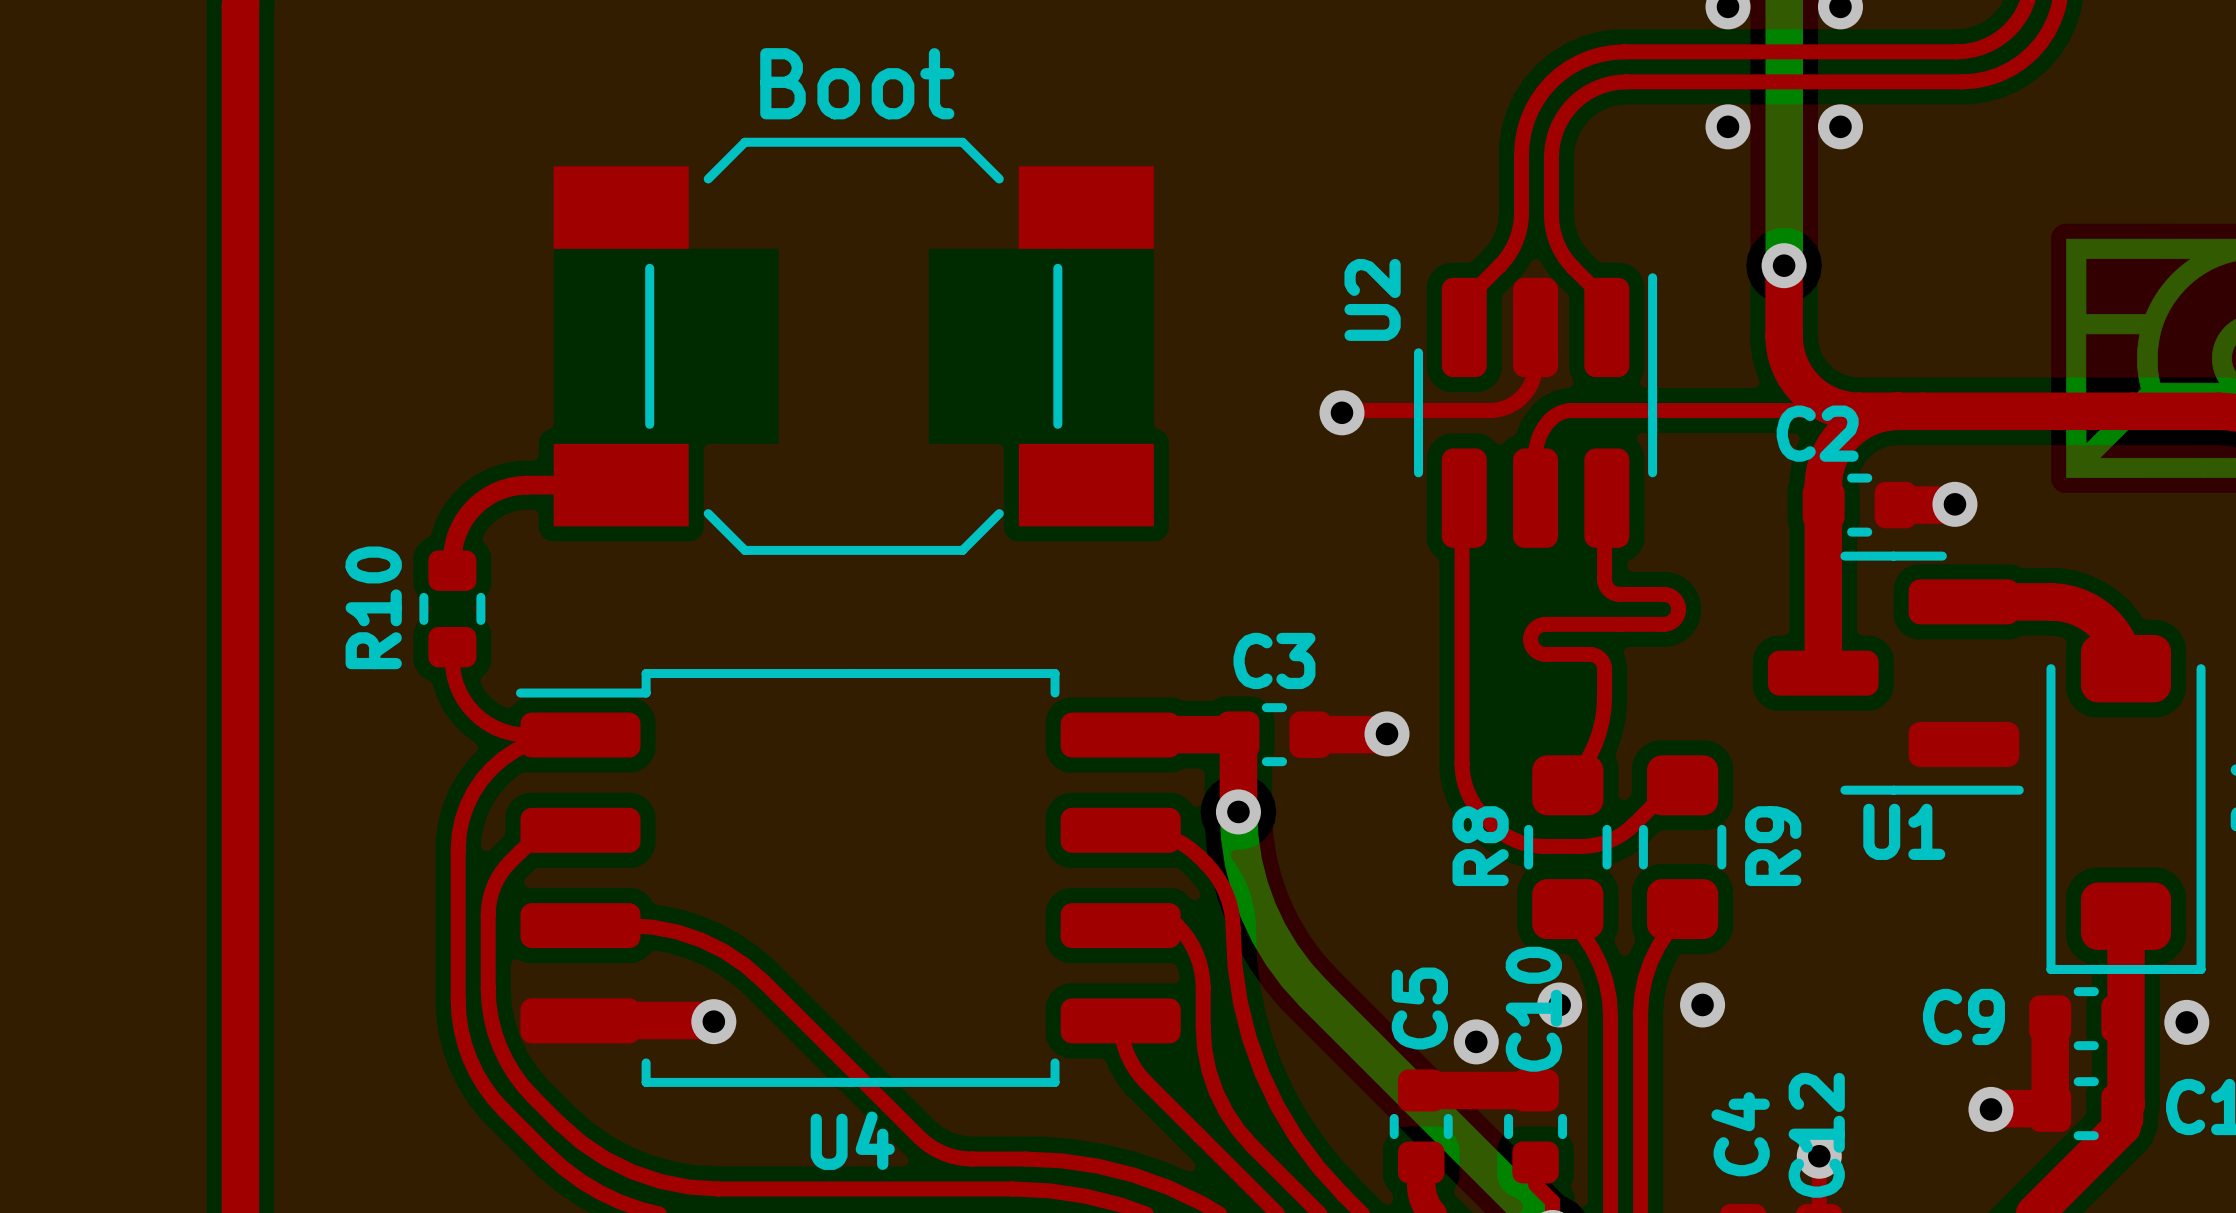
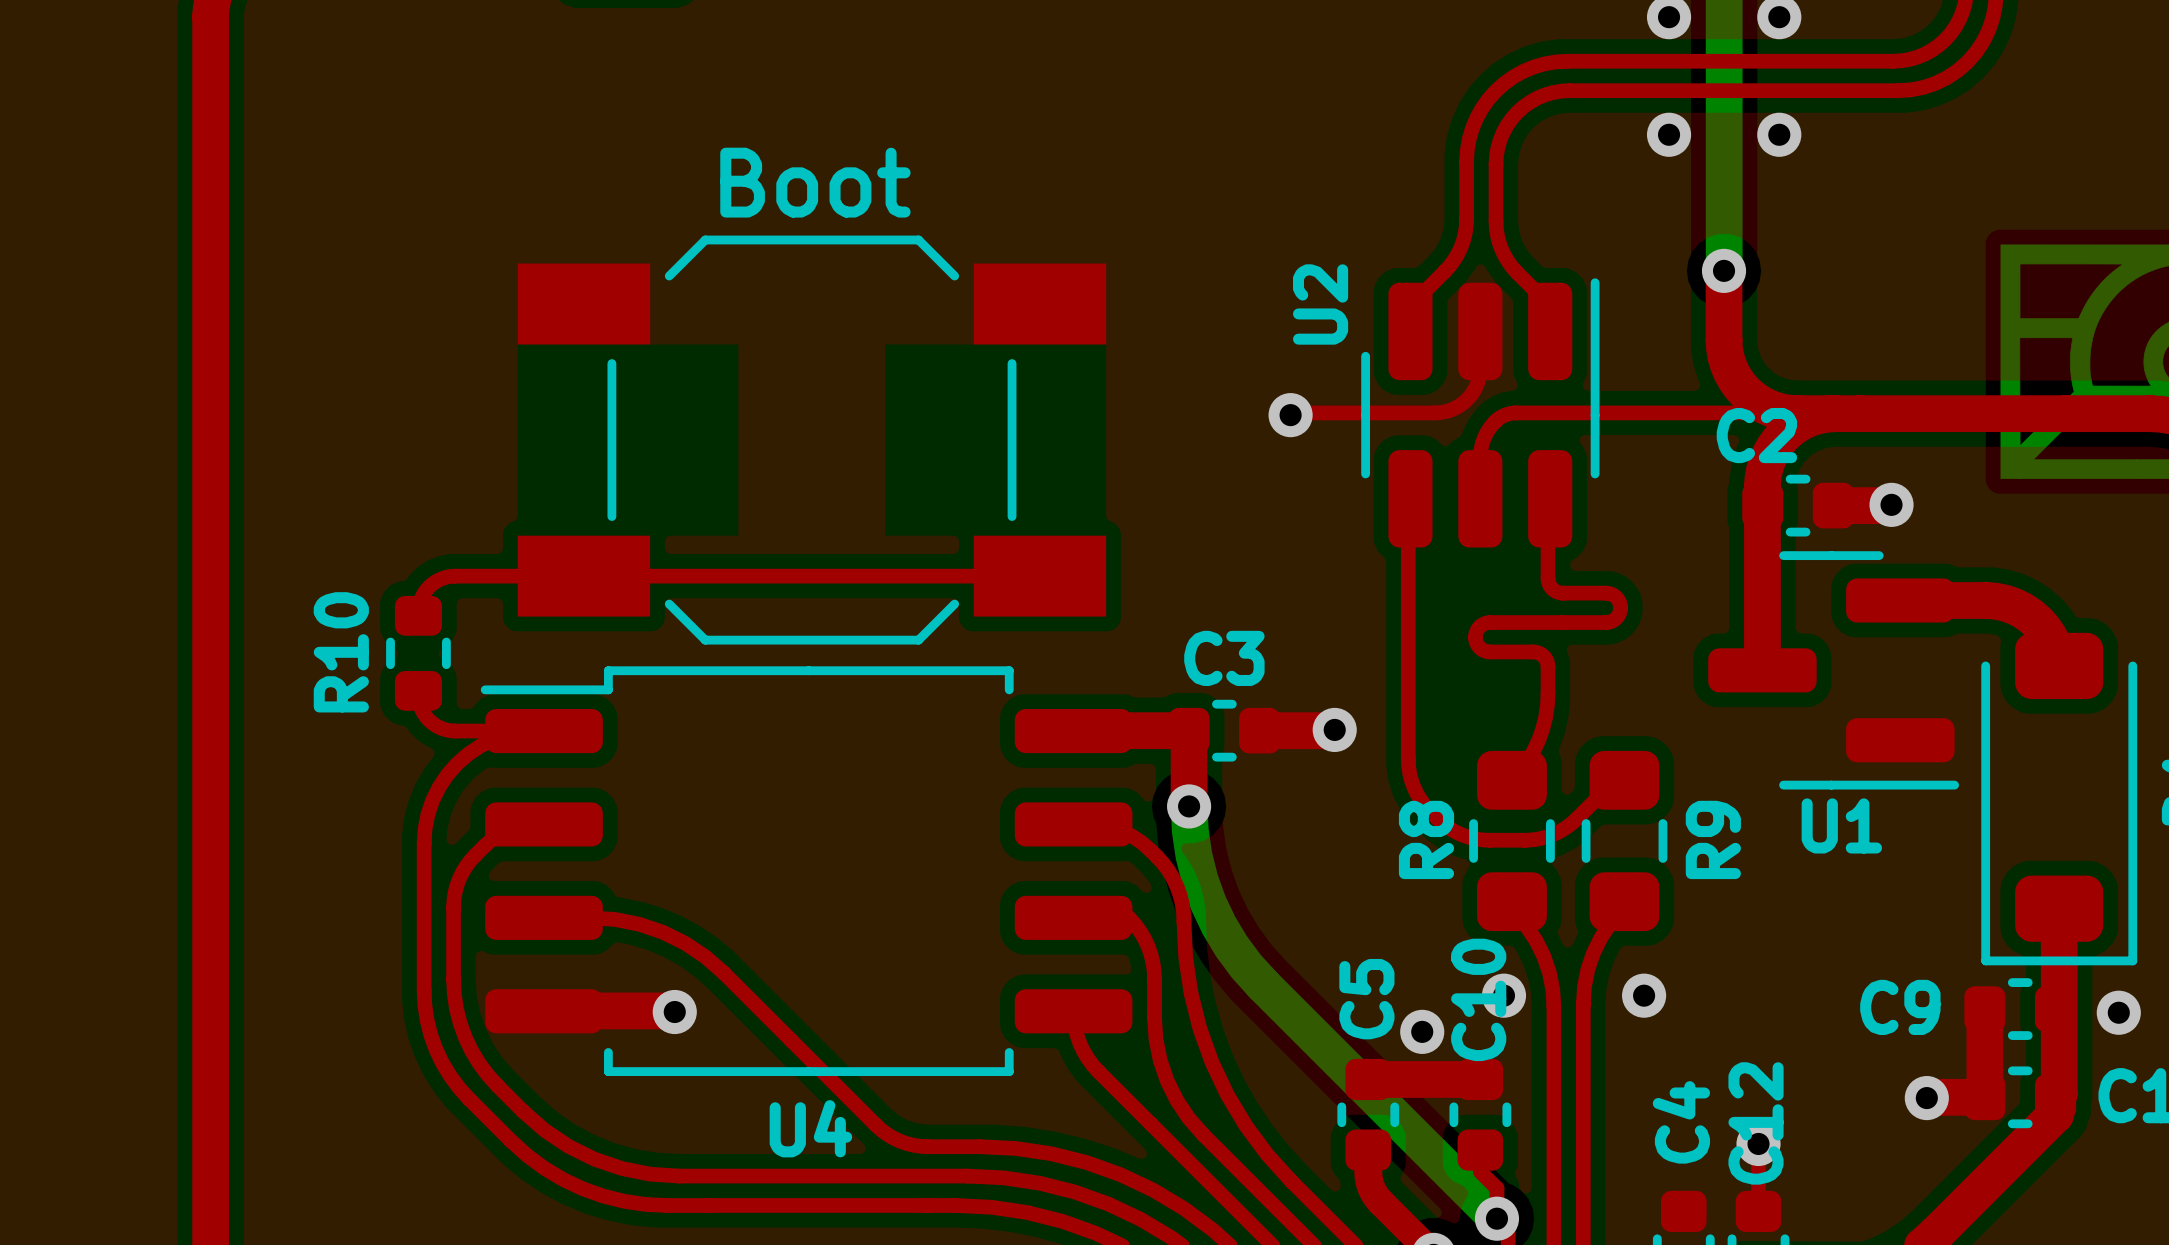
part position: (853, 346) -> (811, 440)
top track: (621, 485) (519, 485) (494, 492) (474, 507) (459, 527) (454, 543) (452, 570) -> none
top track: none -> (1039, 576) (455, 576) (441, 578) (429, 586) (421, 598) (418, 615)
R10 position: (452, 608) -> (418, 653)
top track: (452, 647) (454, 676) (459, 692) (468, 706) (480, 718) (494, 727) (510, 733) (527, 735) -> (418, 690) (419, 703) (423, 712) (436, 726) (450, 730) (492, 731)

